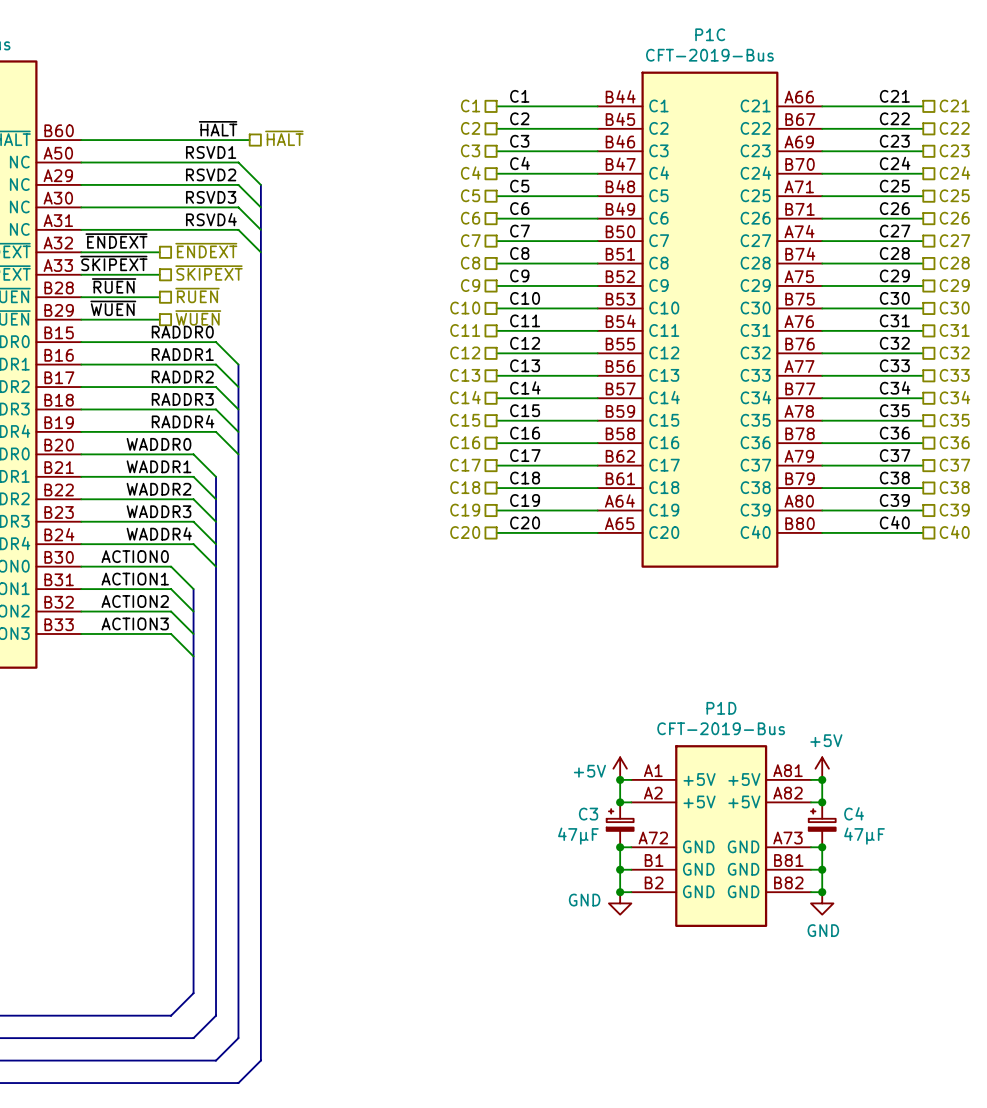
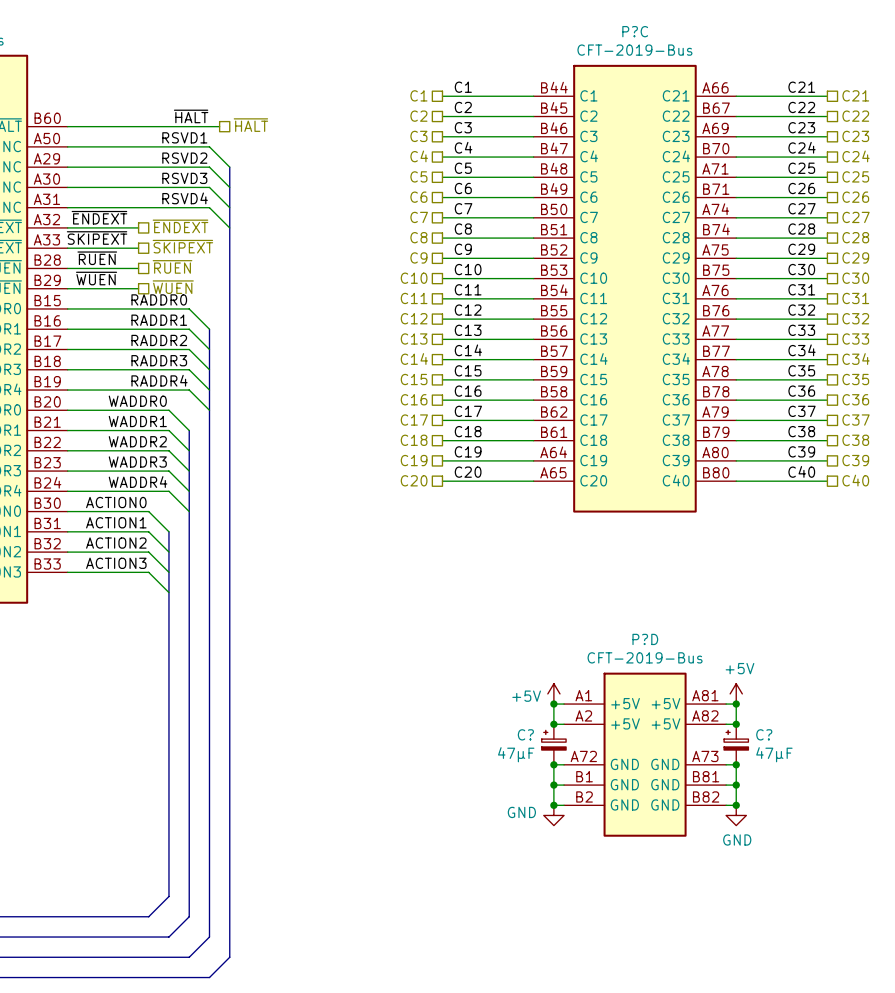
P1C name: P1C (710, 34) -> P?C (635, 31)
P1D name: P1D (721, 708) -> P?D (645, 639)
C4 name: C4 (854, 813) -> C? (764, 734)
C3 name: C3 (588, 814) -> C? (525, 734)

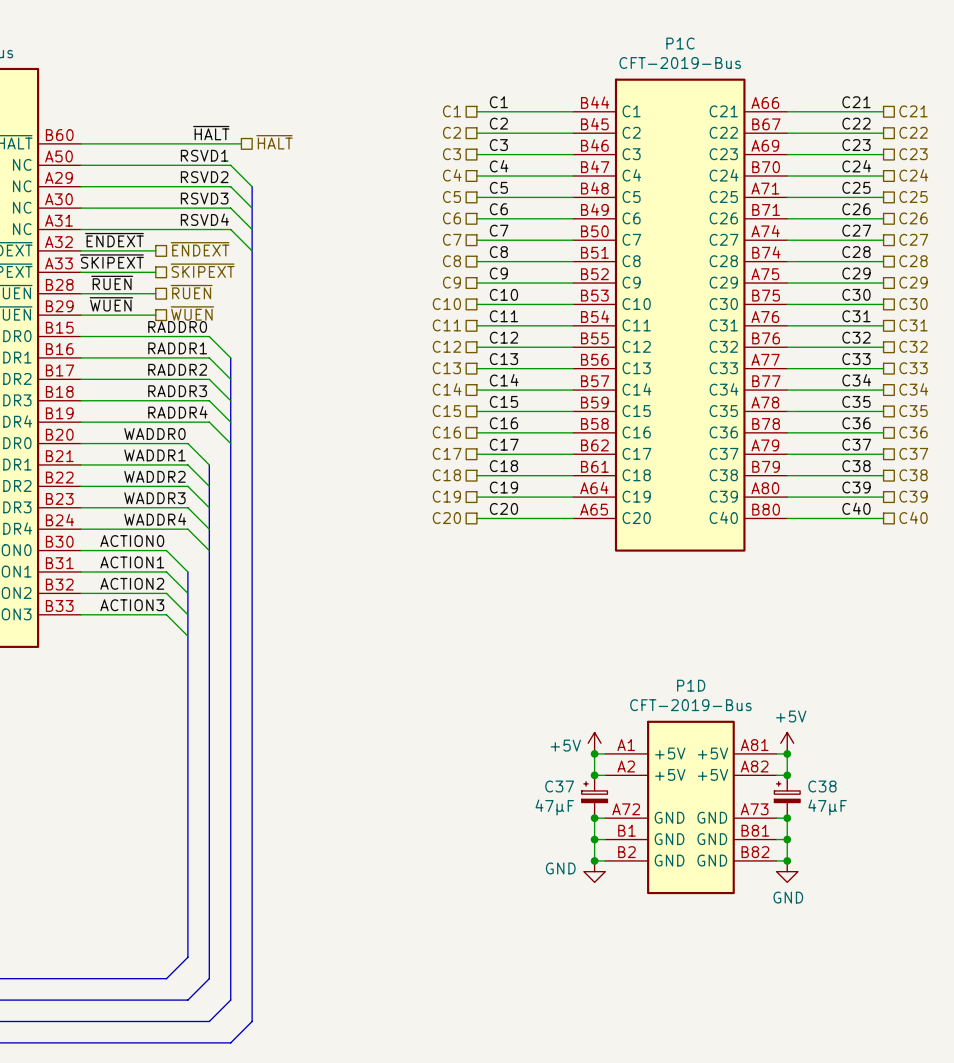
P?C name: P?C (635, 31) -> P1C (680, 43)
P?D name: P?D (645, 639) -> P1D (691, 685)
C? name: C? (525, 734) -> C37 (559, 786)
C? name: C? (764, 734) -> C38 (822, 786)

